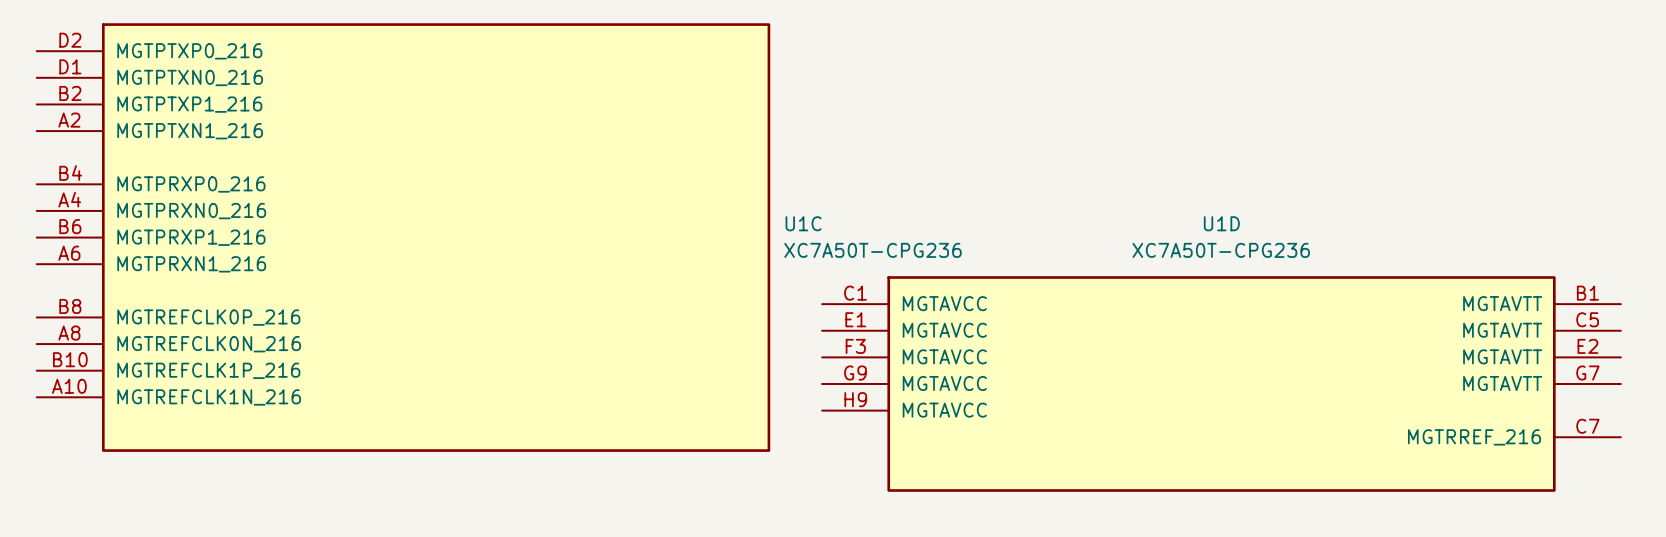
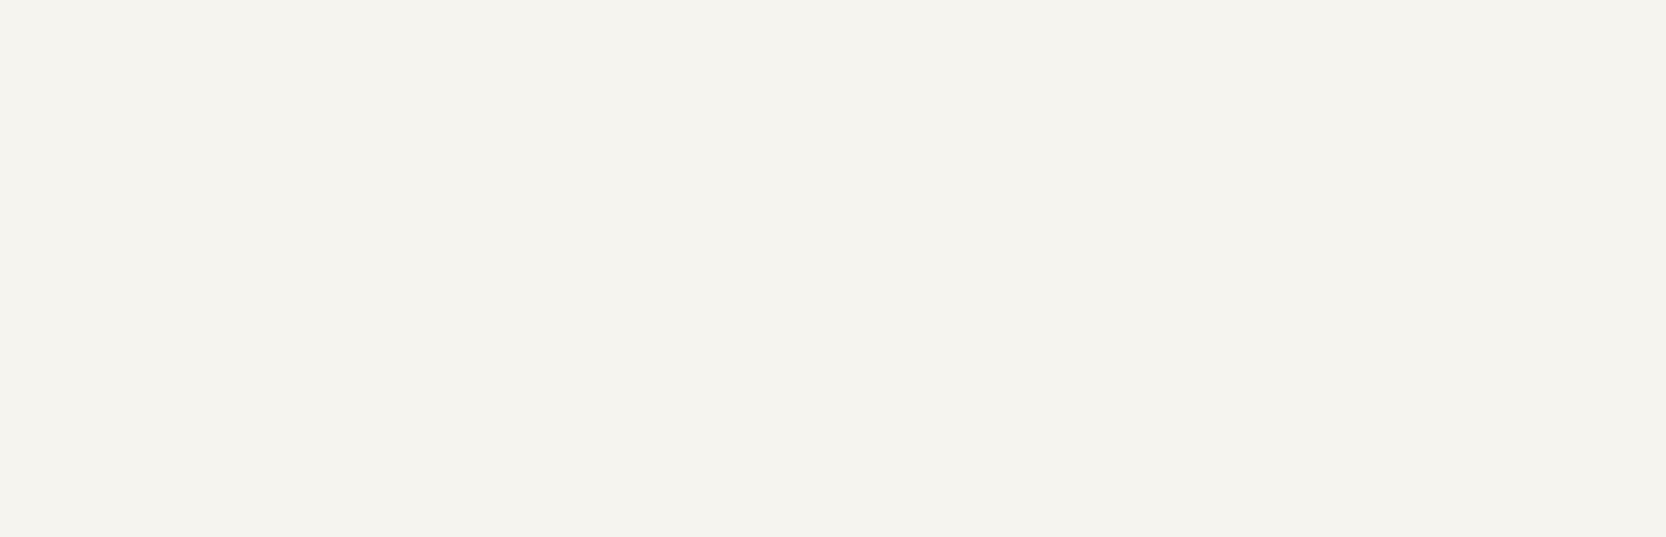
U1C: XC7A50T-CPG236 (403, 237) -> none
U1D: XC7A50T-CPG236 (1221, 384) -> none

